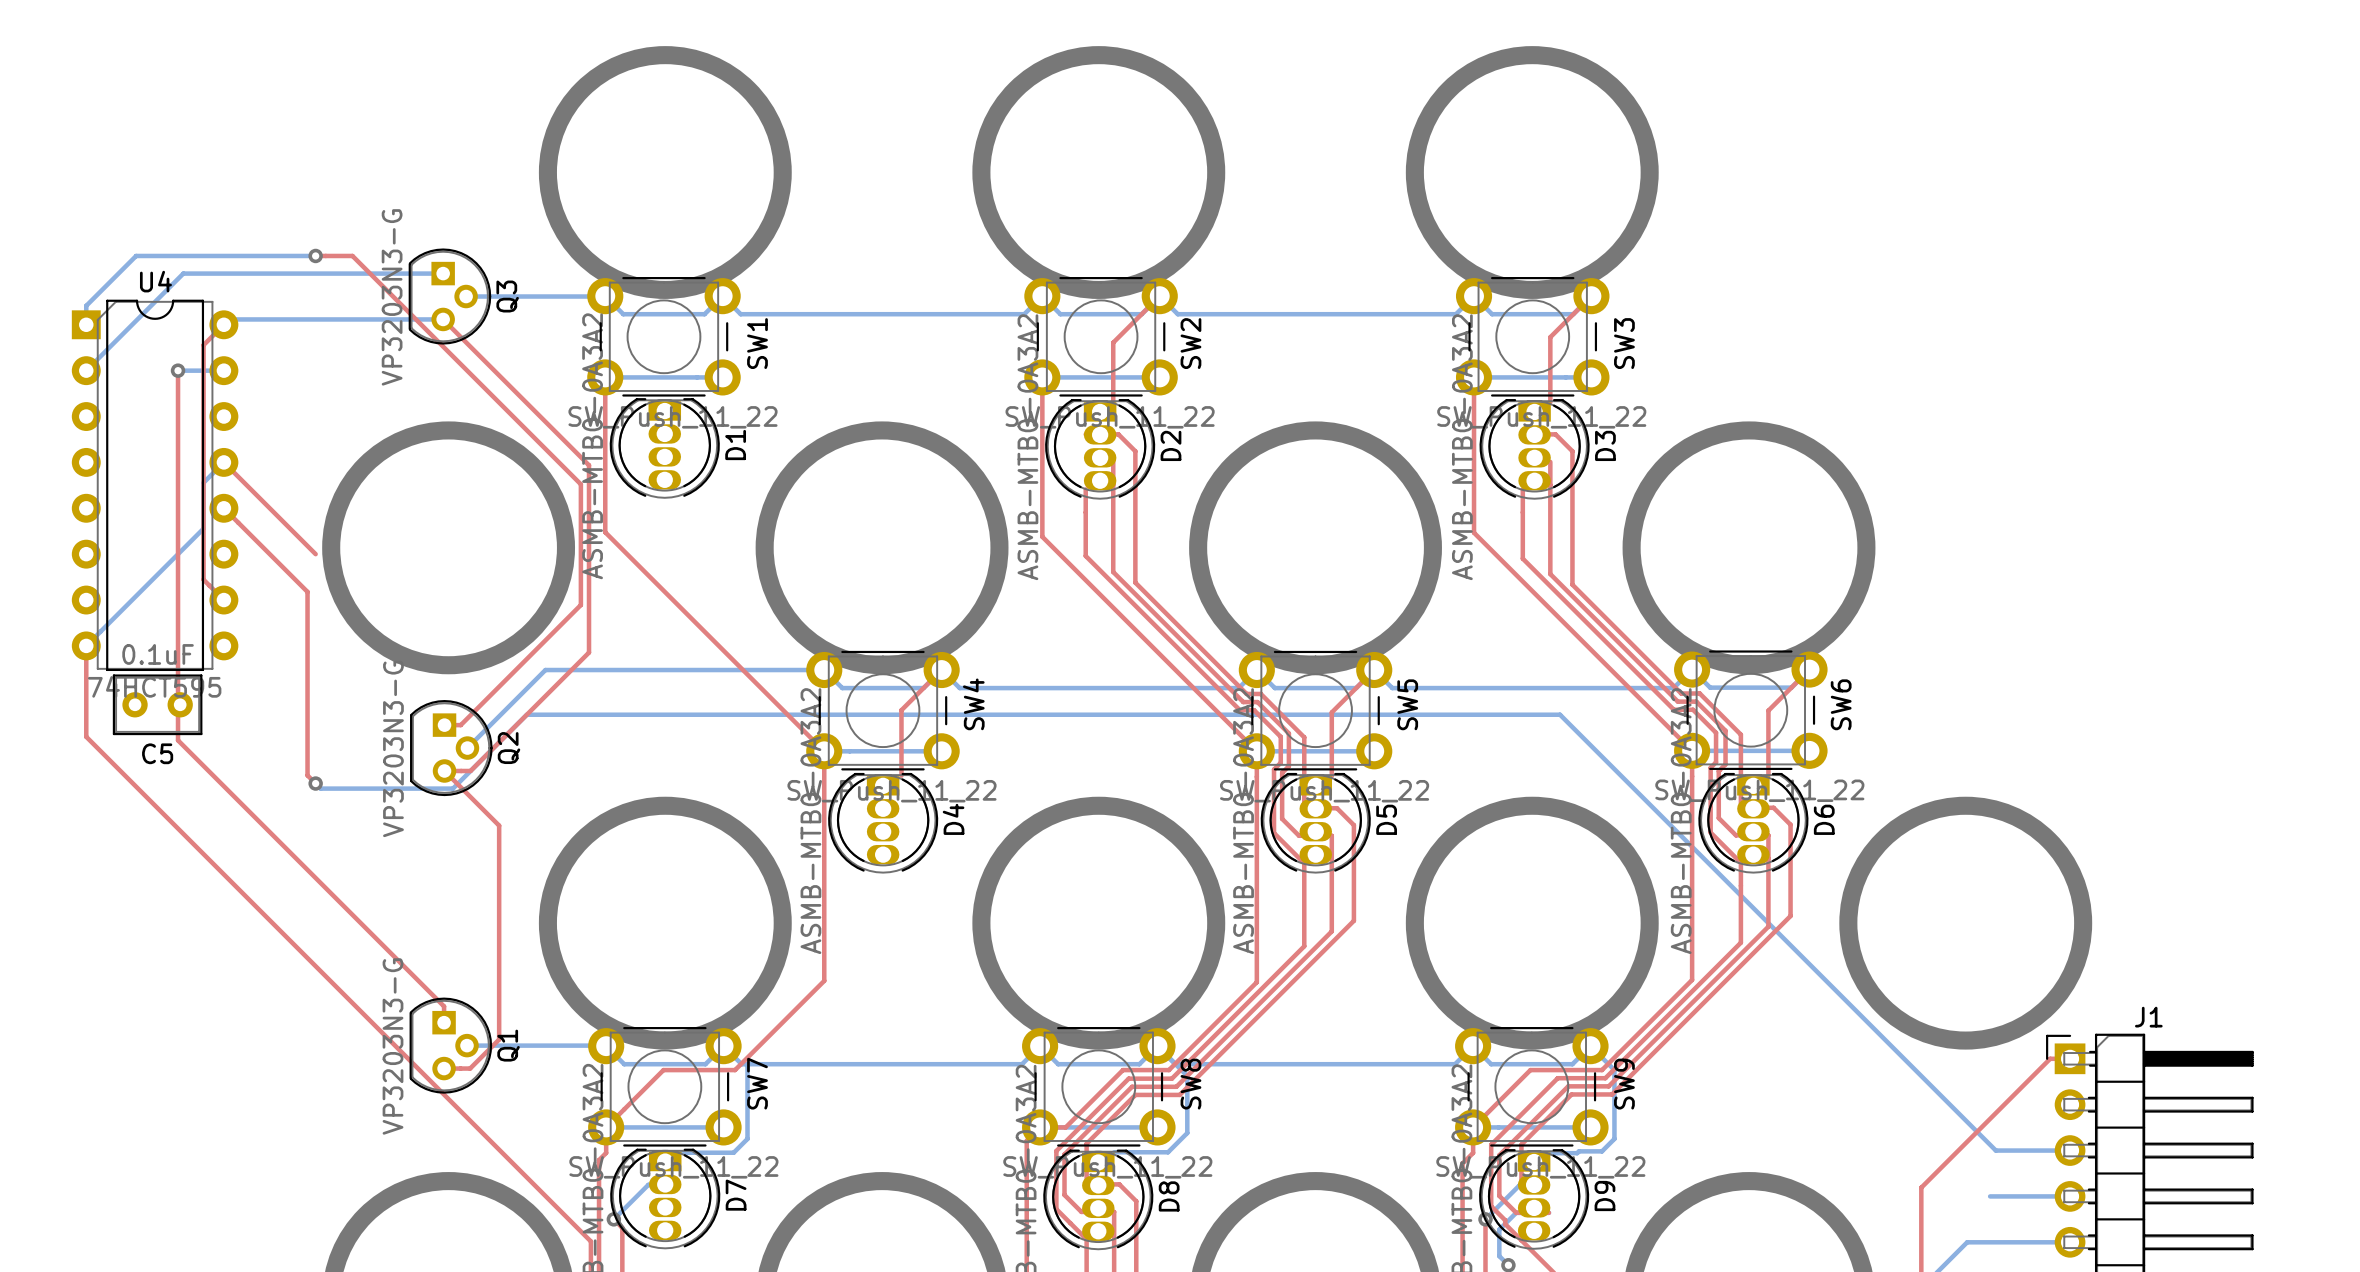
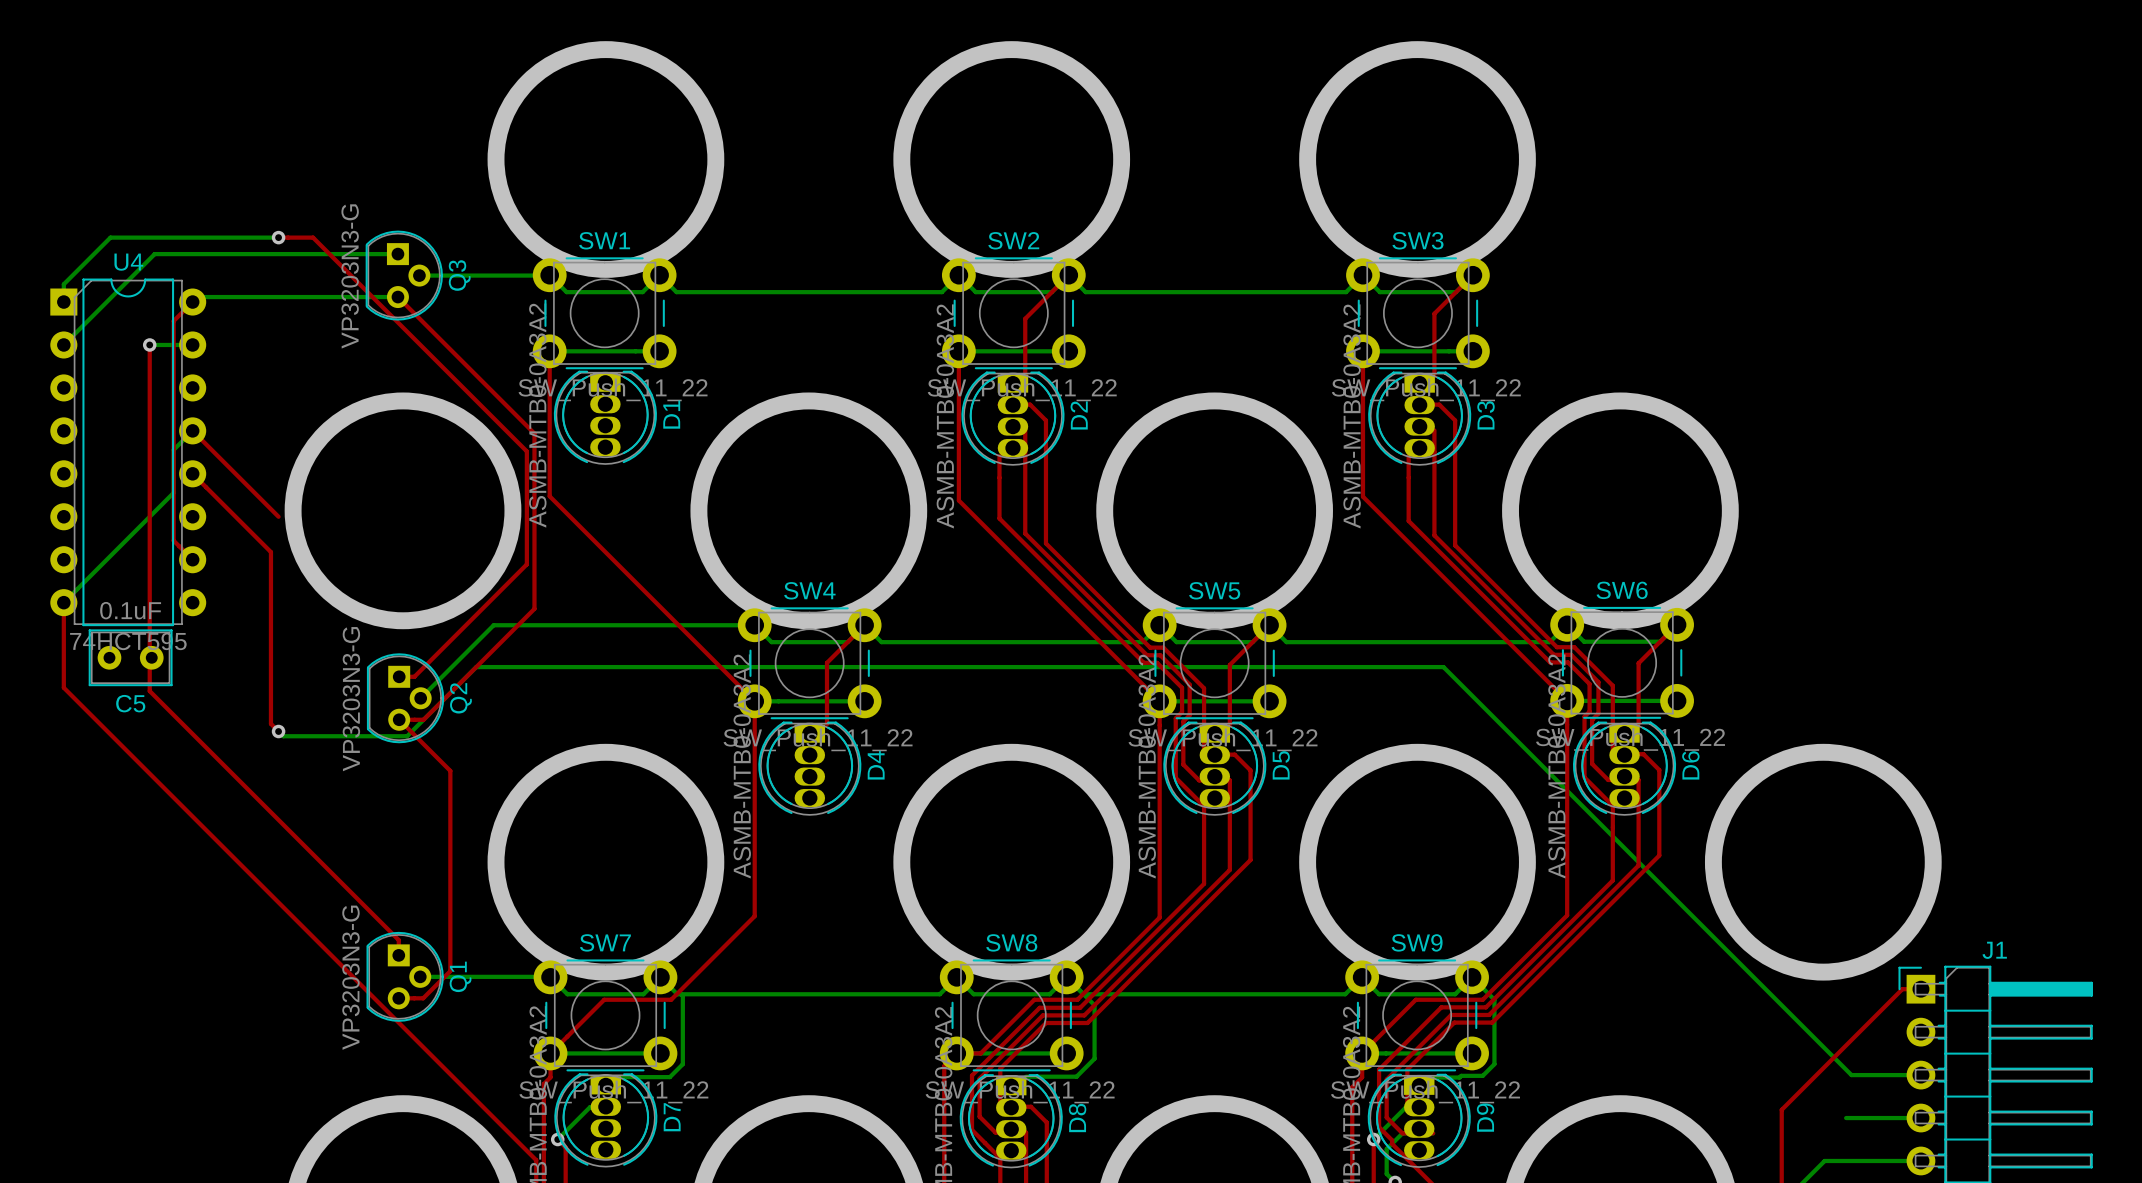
SW1 name rotation: 0° (757, 343) -> 90° clockwise (604, 240)
SW1 name position: SW1 (757, 343) -> SW1 (604, 240)
SW2 name rotation: 0° (1190, 343) -> 90° clockwise (1013, 240)
SW2 name position: SW2 (1190, 343) -> SW2 (1013, 240)
SW3 name rotation: 0° (1624, 343) -> 90° clockwise (1417, 240)
SW3 name position: SW3 (1624, 343) -> SW3 (1417, 240)
SW4 name rotation: 0° (973, 704) -> 90° clockwise (809, 590)
SW4 name position: SW4 (973, 704) -> SW4 (809, 590)
SW5 name rotation: 0° (1407, 704) -> 90° clockwise (1214, 590)
SW5 name position: SW5 (1407, 704) -> SW5 (1214, 590)
SW6 name rotation: 0° (1841, 704) -> 90° clockwise (1622, 590)
SW6 name position: SW6 (1841, 704) -> SW6 (1622, 590)
SW7 name rotation: 0° (757, 1083) -> 90° clockwise (605, 942)
SW7 name position: SW7 (757, 1083) -> SW7 (605, 942)
SW8 name rotation: 0° (1190, 1084) -> 90° clockwise (1011, 942)
SW8 name position: SW8 (1190, 1084) -> SW8 (1011, 942)
SW9 name rotation: 0° (1624, 1084) -> 90° clockwise (1417, 942)
SW9 name position: SW9 (1624, 1084) -> SW9 (1417, 942)

